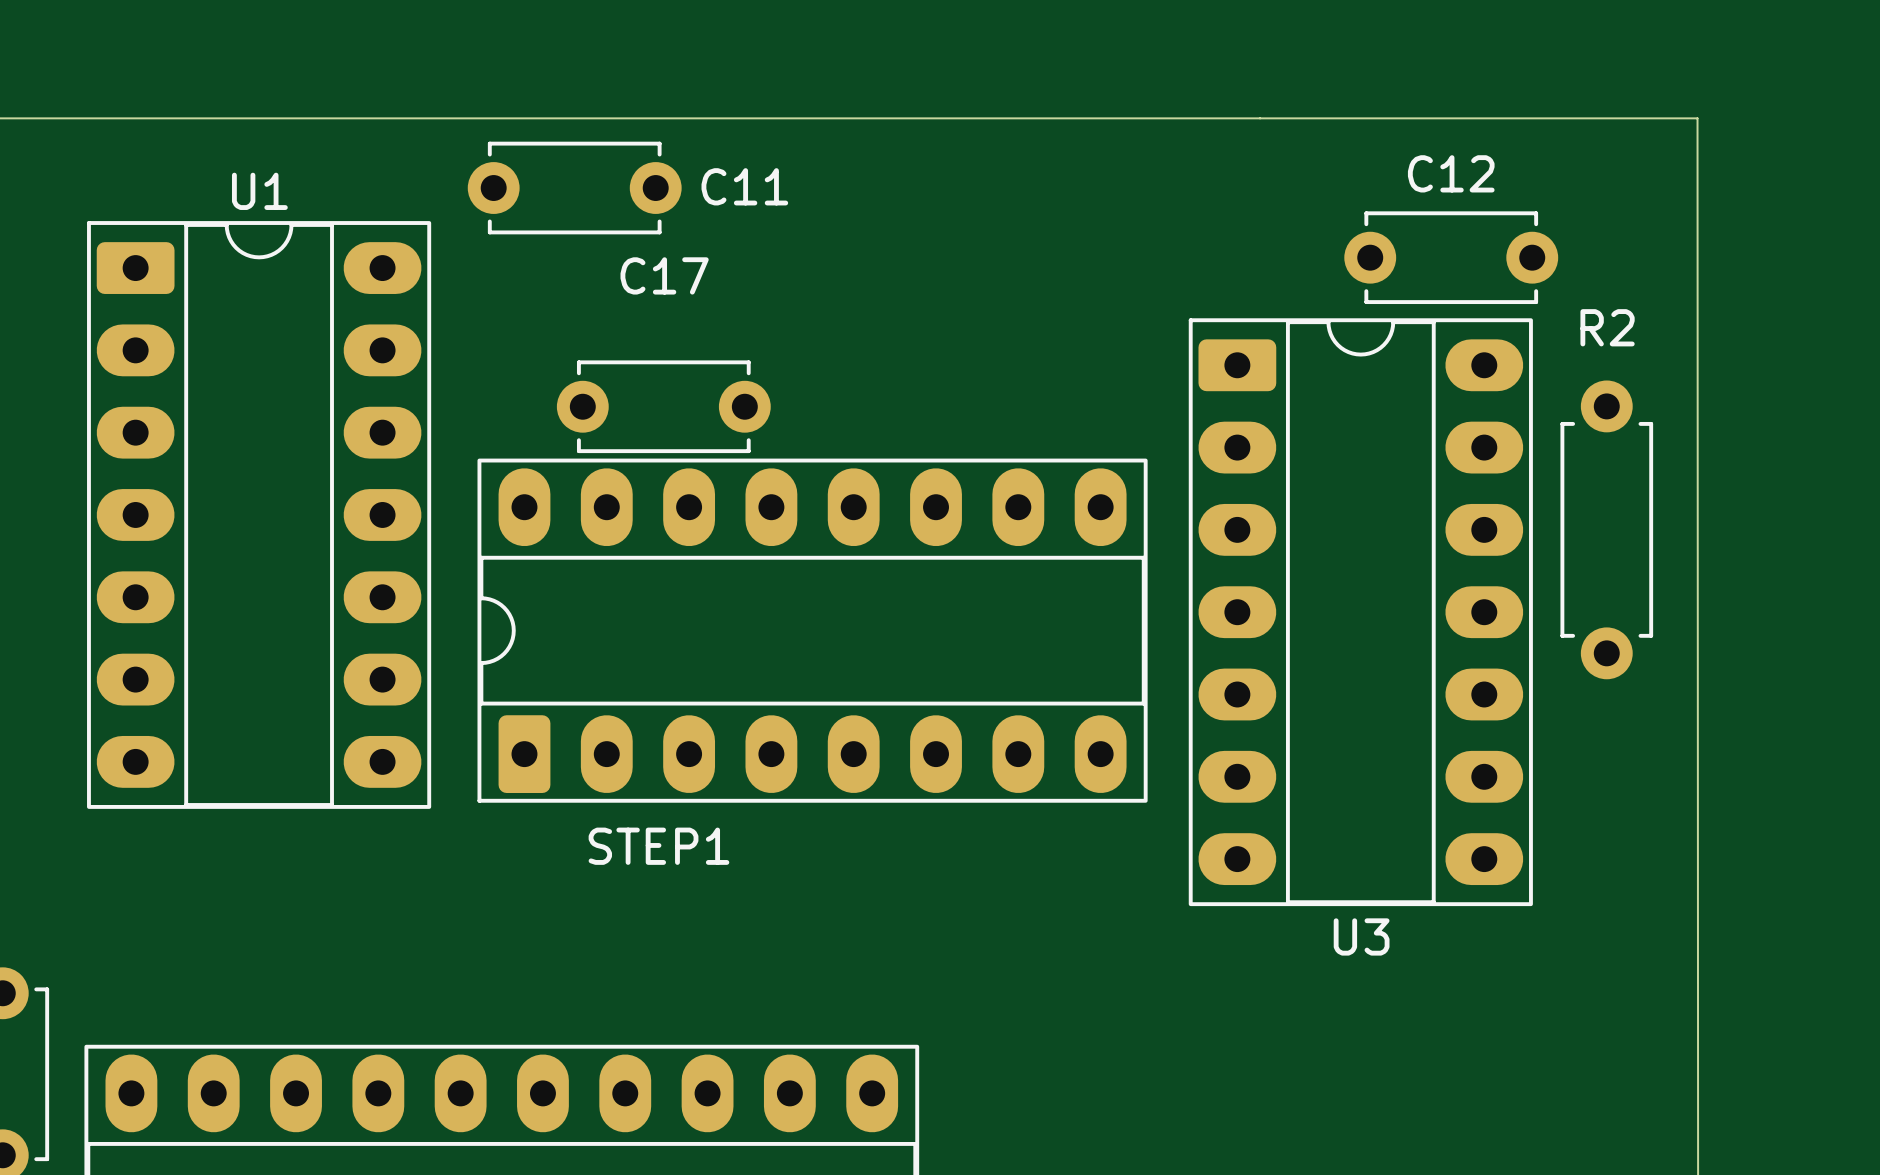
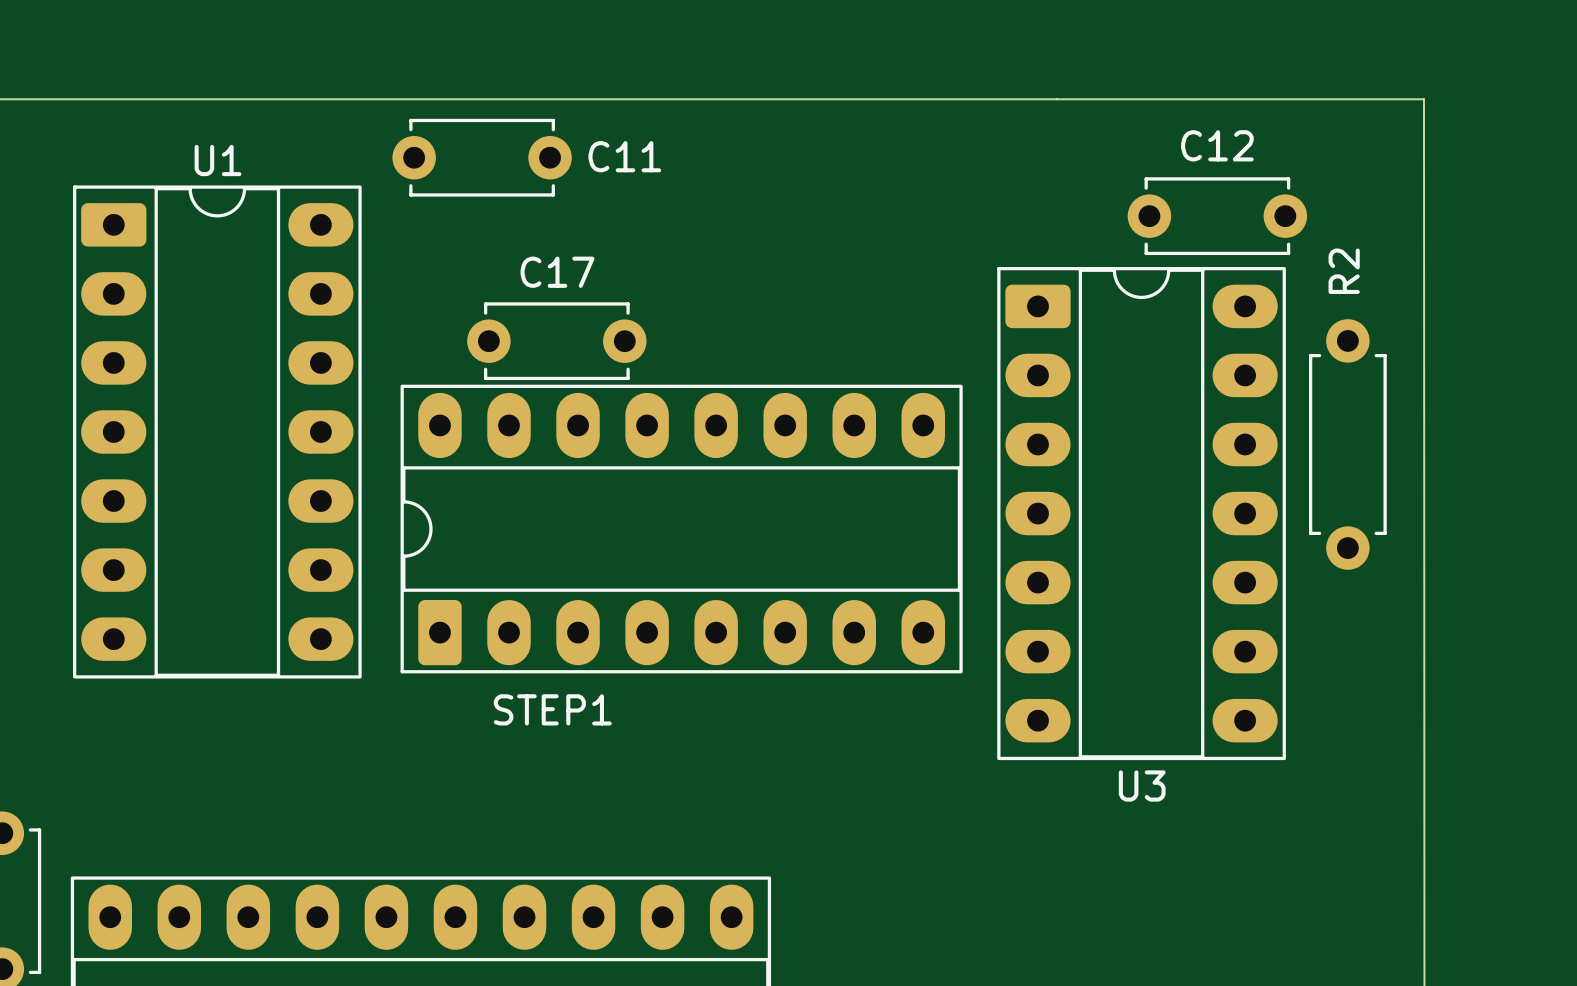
C17 name position: C17 (664, 275) -> C17 (557, 272)
R2 name rotation: 0° (1607, 327) -> 90° counterclockwise (1344, 271)

